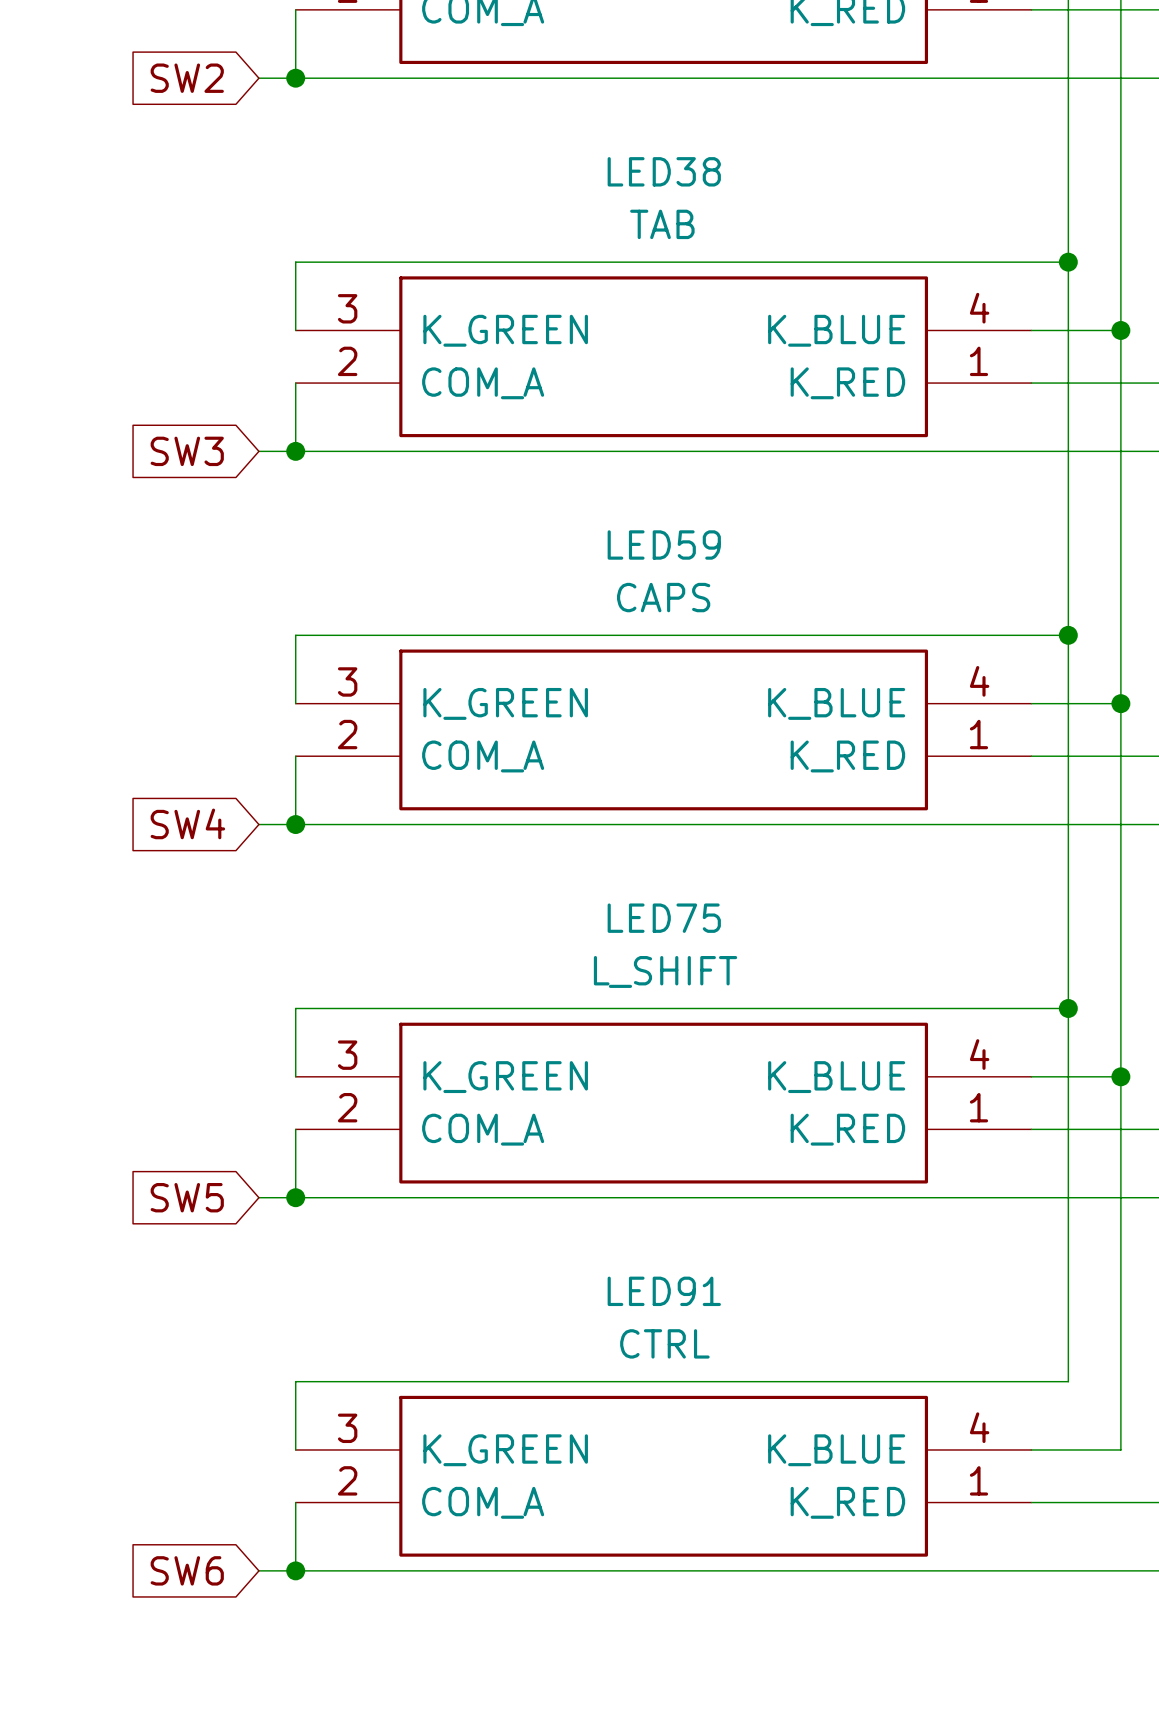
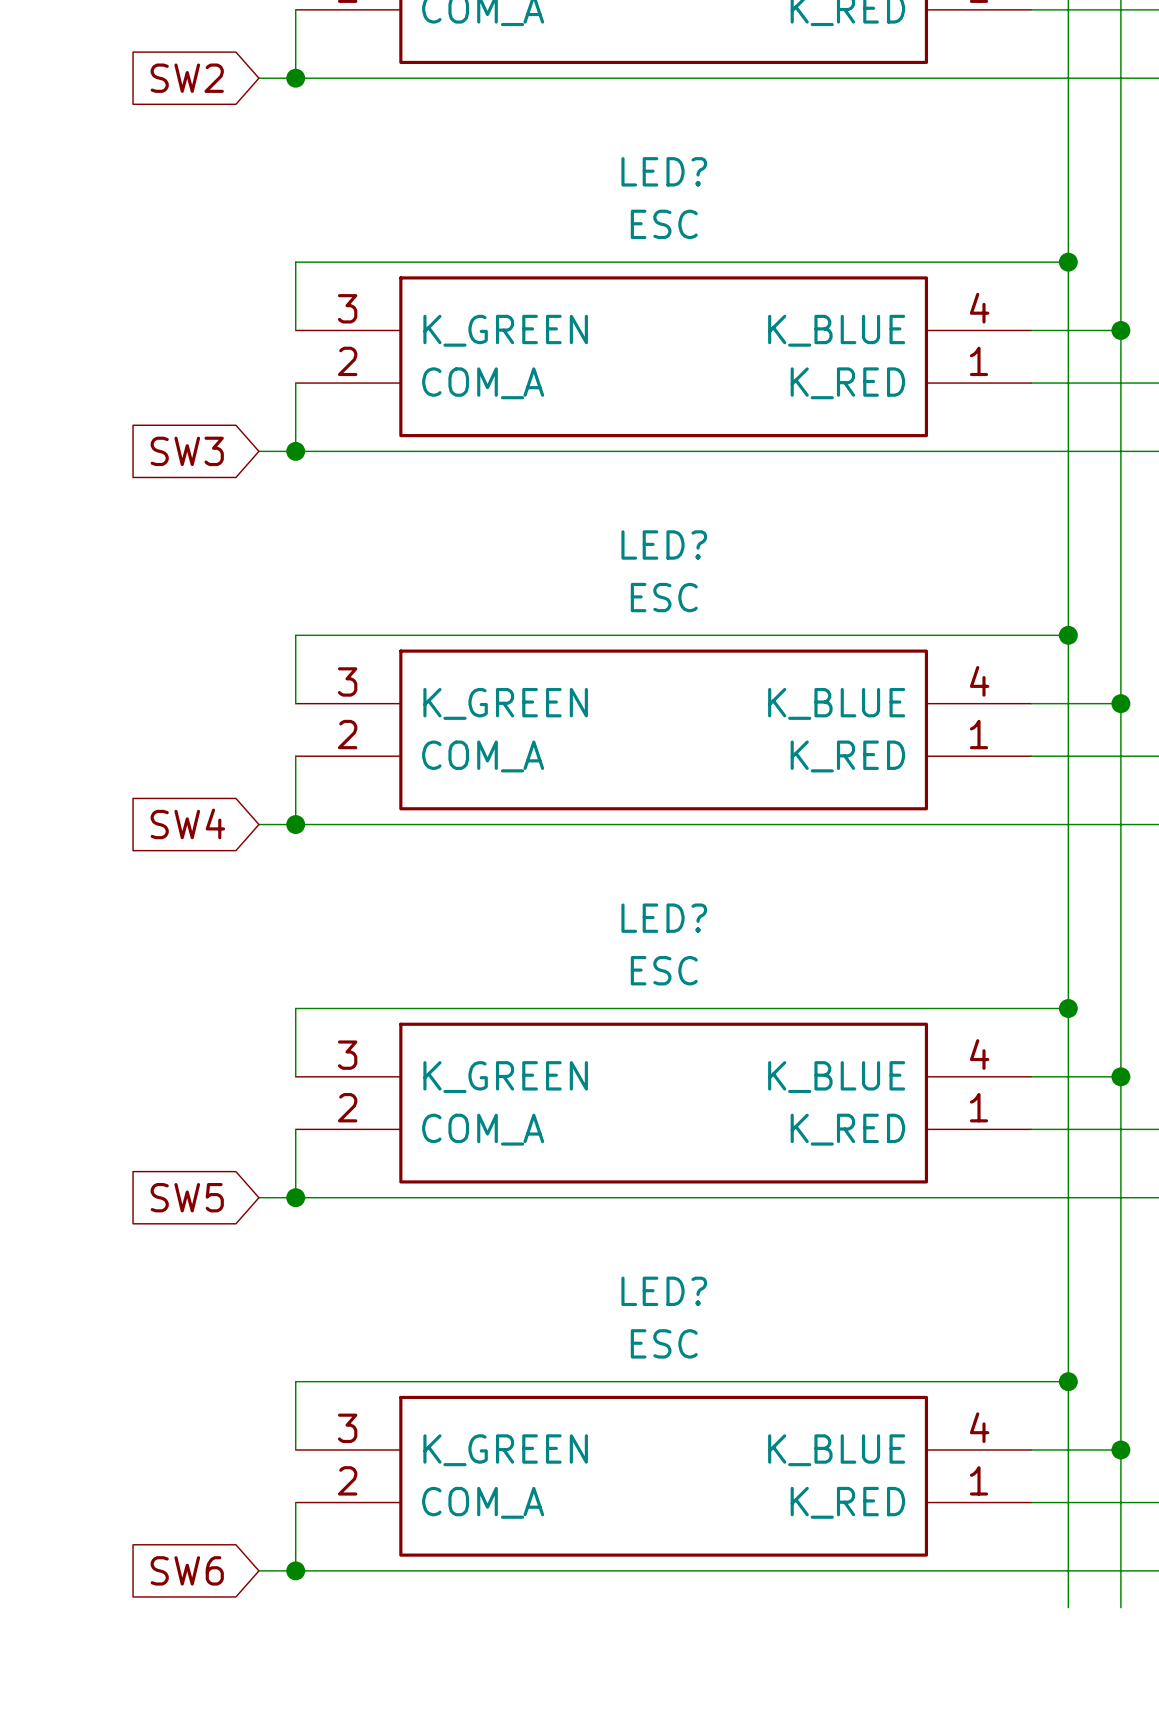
LED38 name: LED38 (664, 171) -> LED? (664, 171)
LED38 value: TAB (662, 224) -> ESC (664, 224)
LED59 name: LED59 (664, 544) -> LED? (664, 544)
LED59 value: CAPS (663, 597) -> ESC (664, 597)
LED75 name: LED75 (664, 918) -> LED? (664, 918)
LED75 value: L_SHIFT (665, 971) -> ESC (664, 970)
LED91 name: LED91 (664, 1291) -> LED? (664, 1291)
LED91 value: CTRL (664, 1343) -> ESC (664, 1343)
wire: none -> (1068, 1381) (1068, 1607)
junction: none -> (1068, 1381)
wire: none -> (1120, 1449) (1120, 1607)
junction: none -> (1120, 1449)

